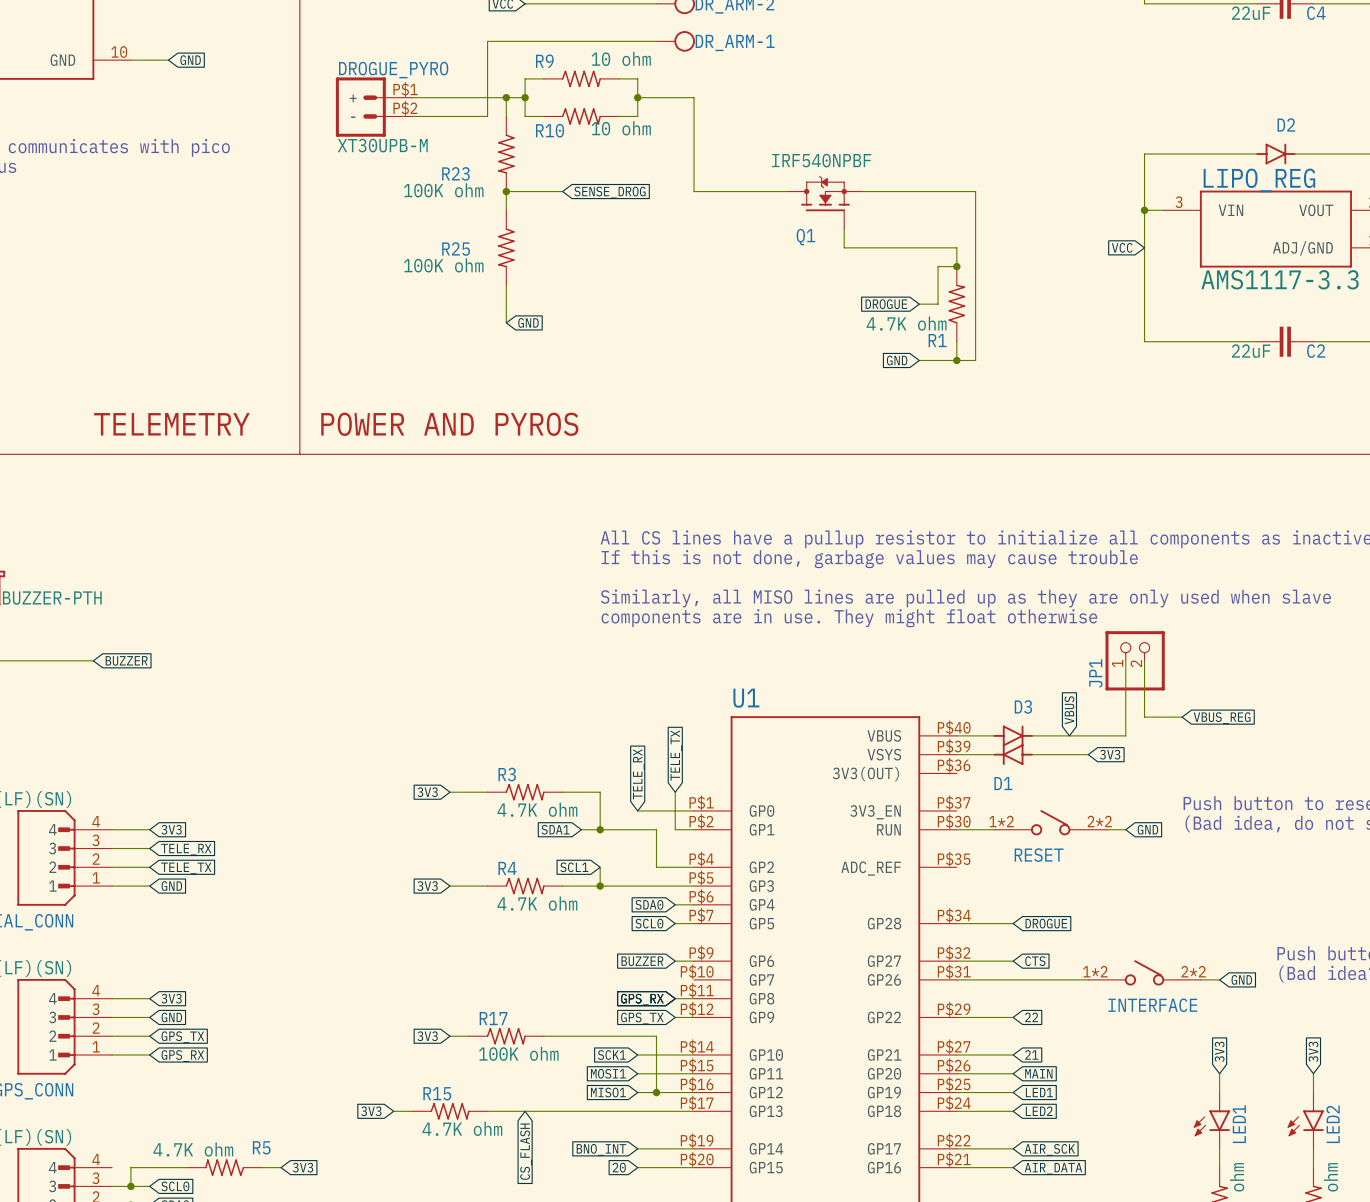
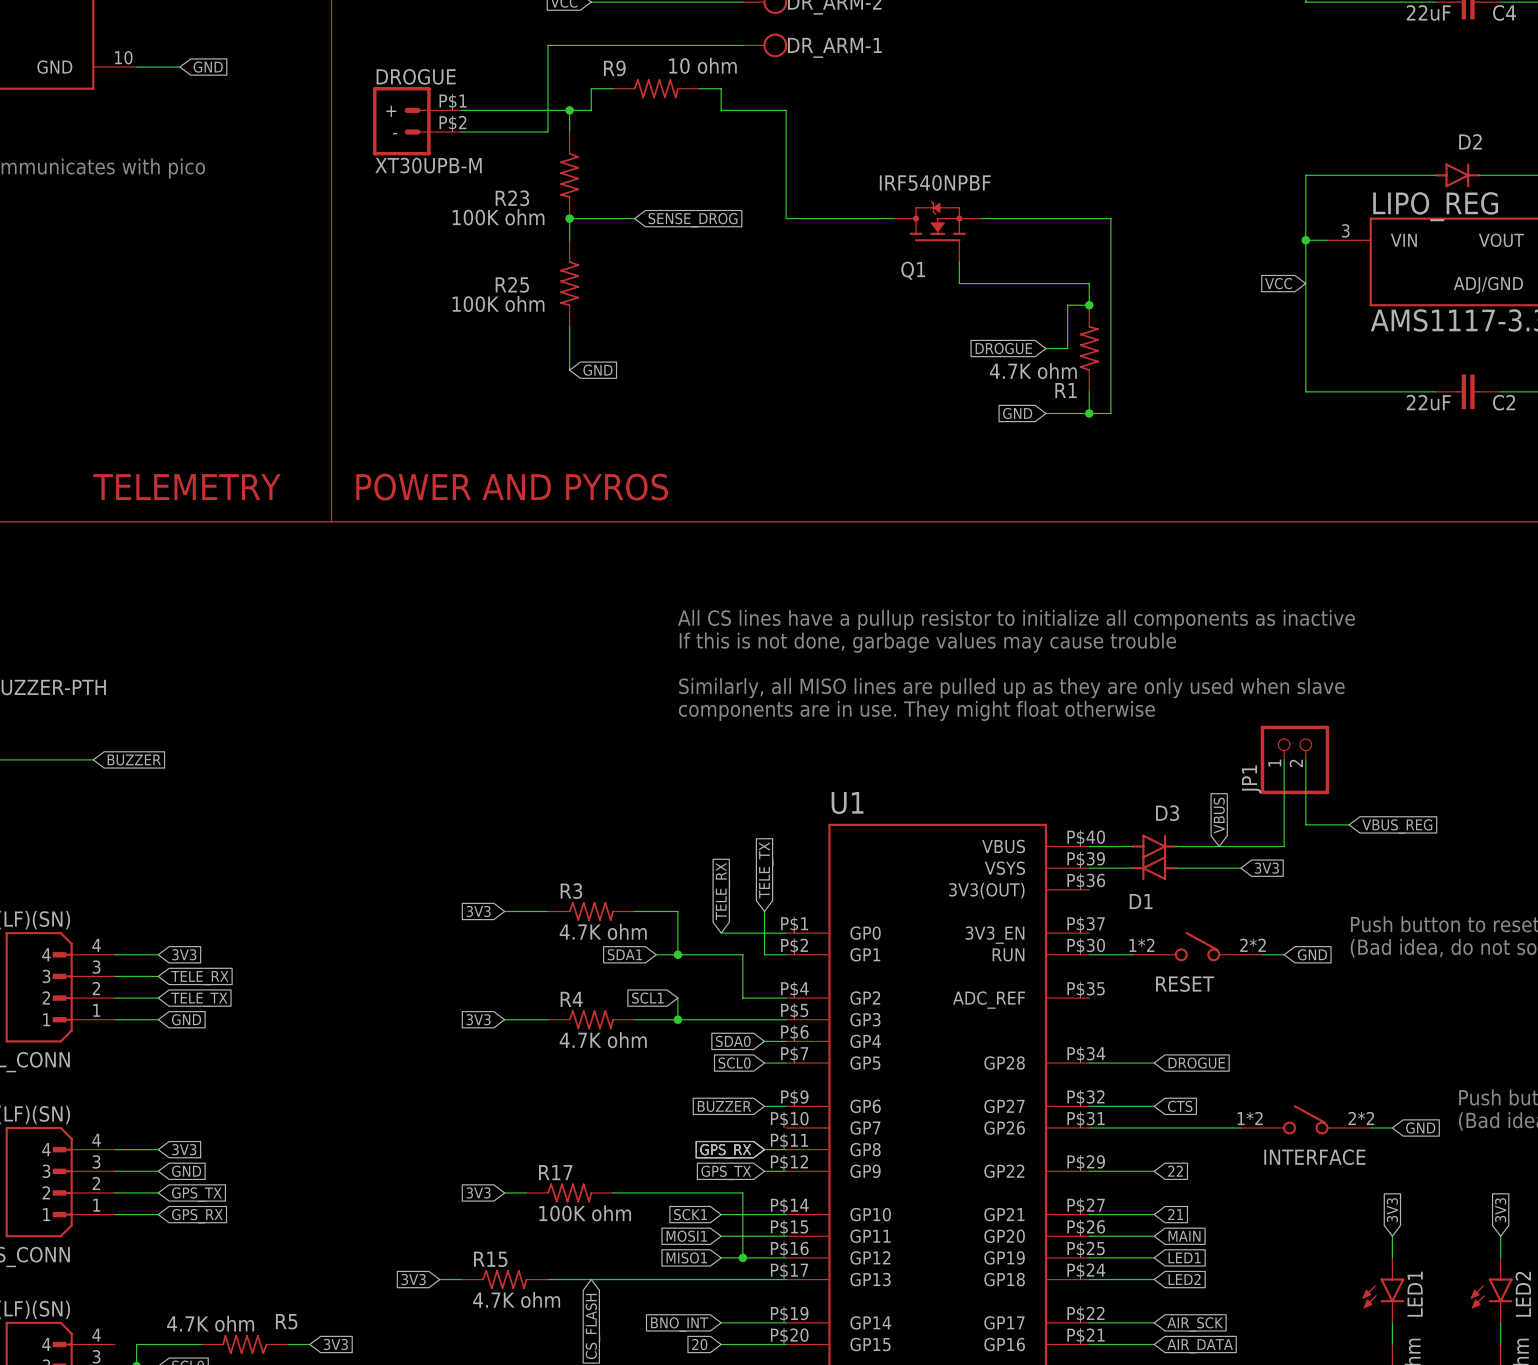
DROGUE_PYRO name: DROGUE_PYRO (393, 70) -> DROGUE (416, 76)
wire: (525, 97) (525, 116) (543, 116) -> none
junction: (525, 97) -> none
wire: (637, 97) (637, 116) (618, 116) -> none
junction: (637, 97) -> none
R10: 10 ohm (581, 116) -> none

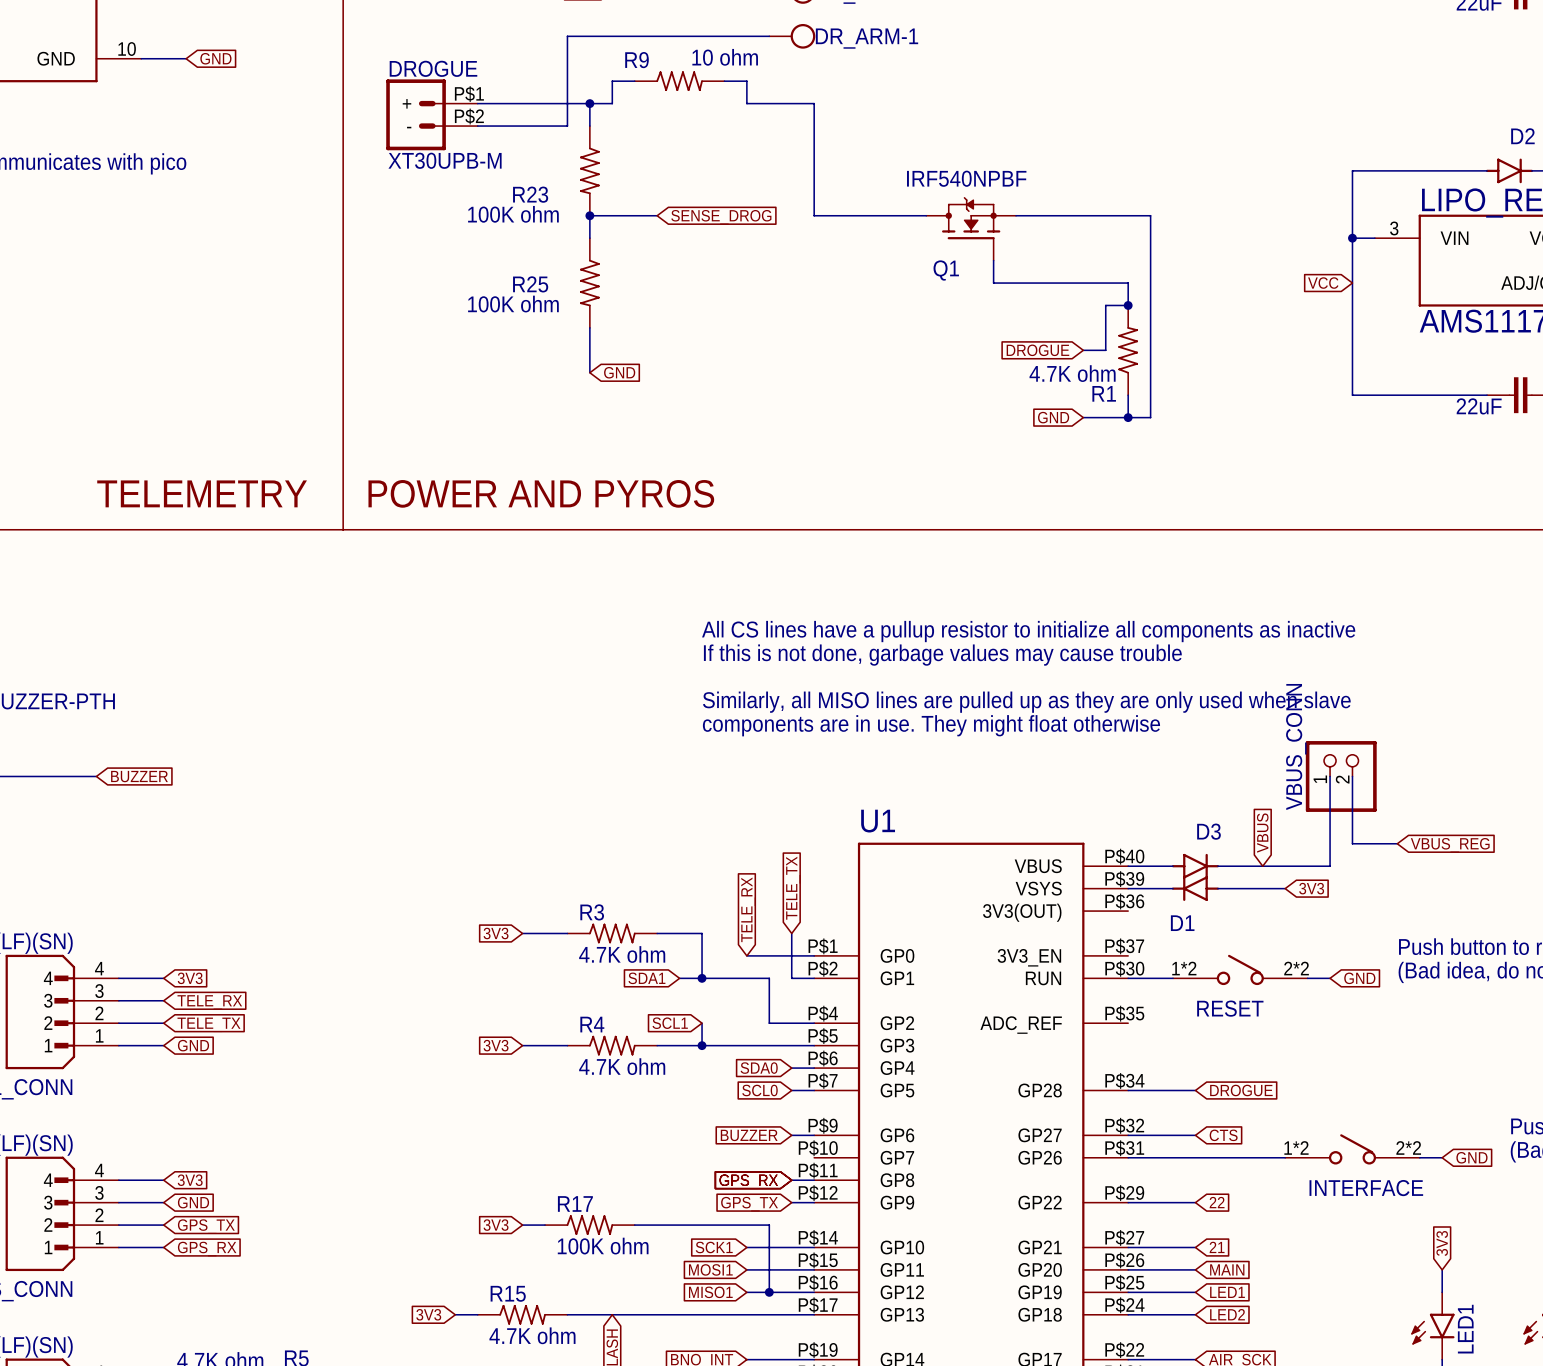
JP1 name: JP1 (1251, 779) -> VBUS_CONN (1296, 747)

